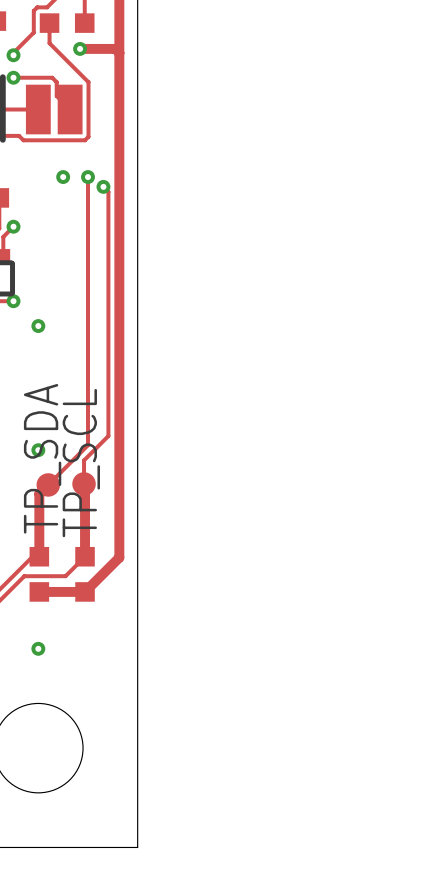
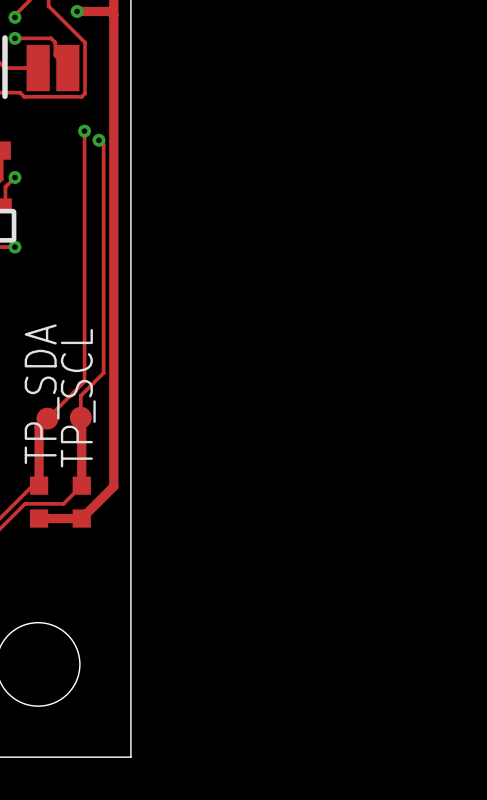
via: (63, 177) -> none
via: (38, 326) -> none
via: (38, 450) -> none
via: (38, 648) -> none

